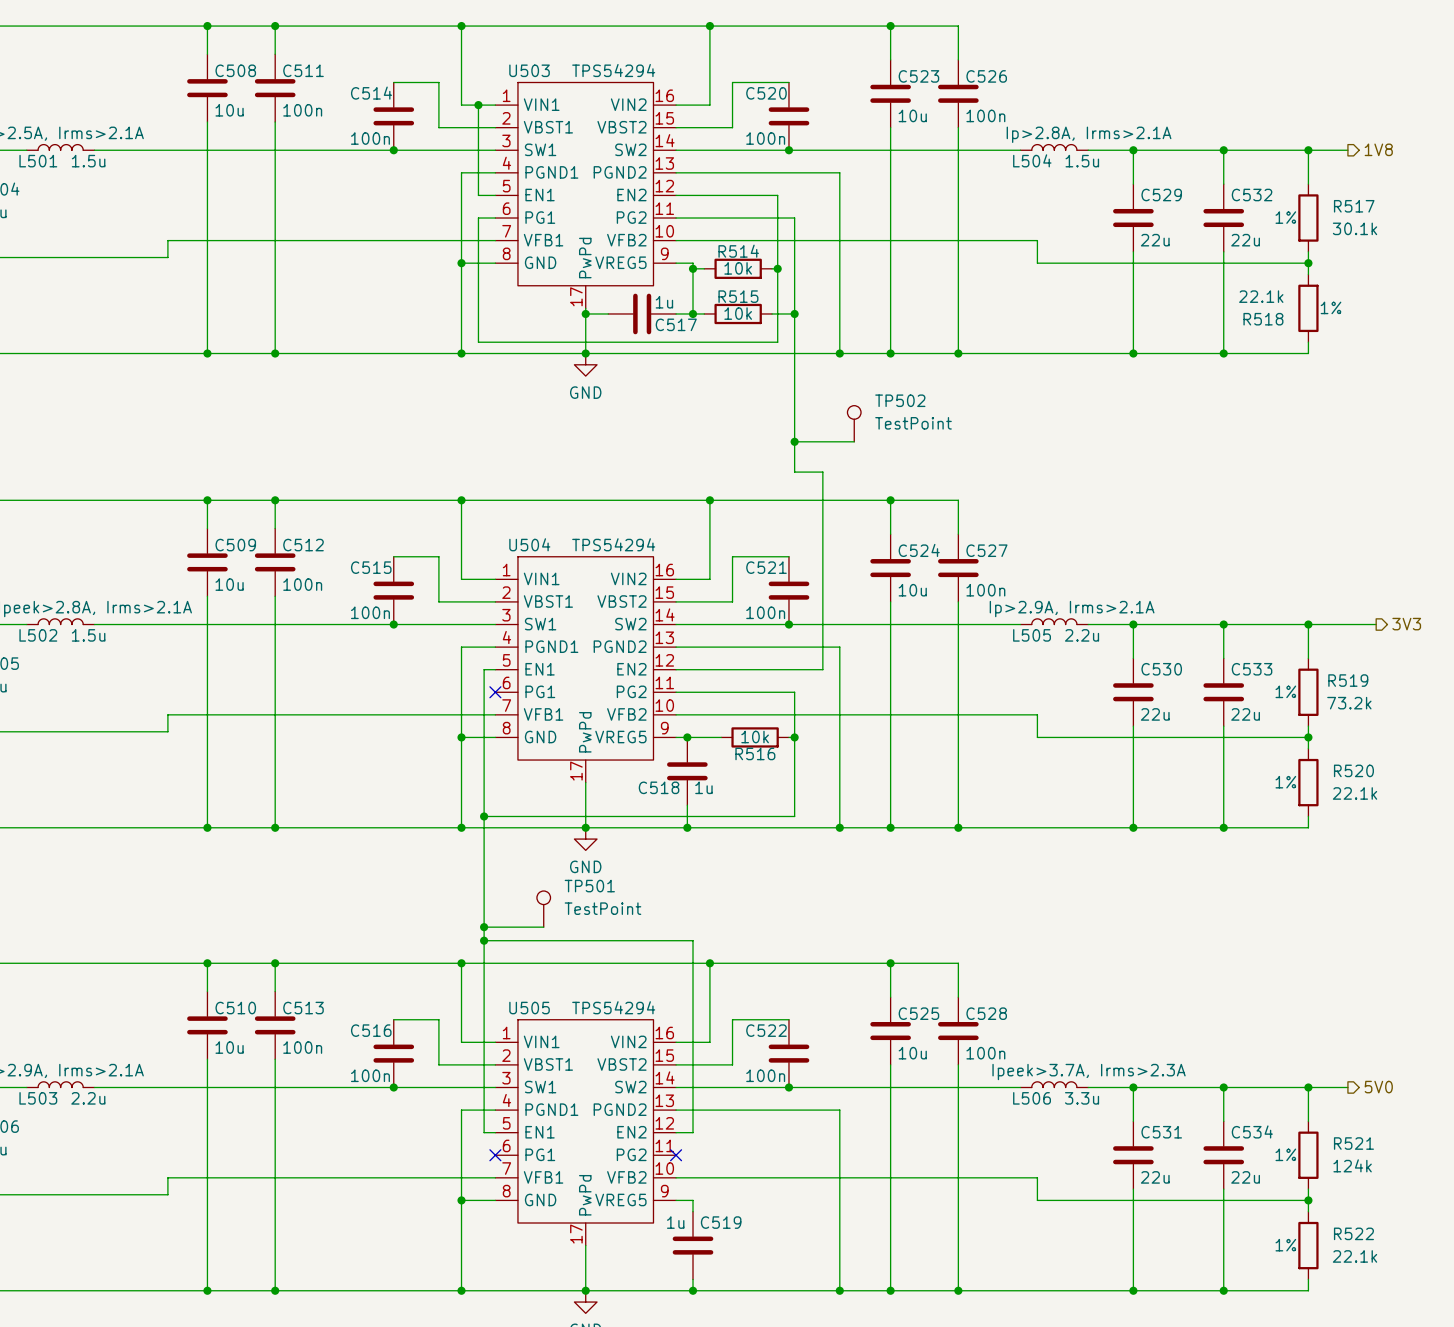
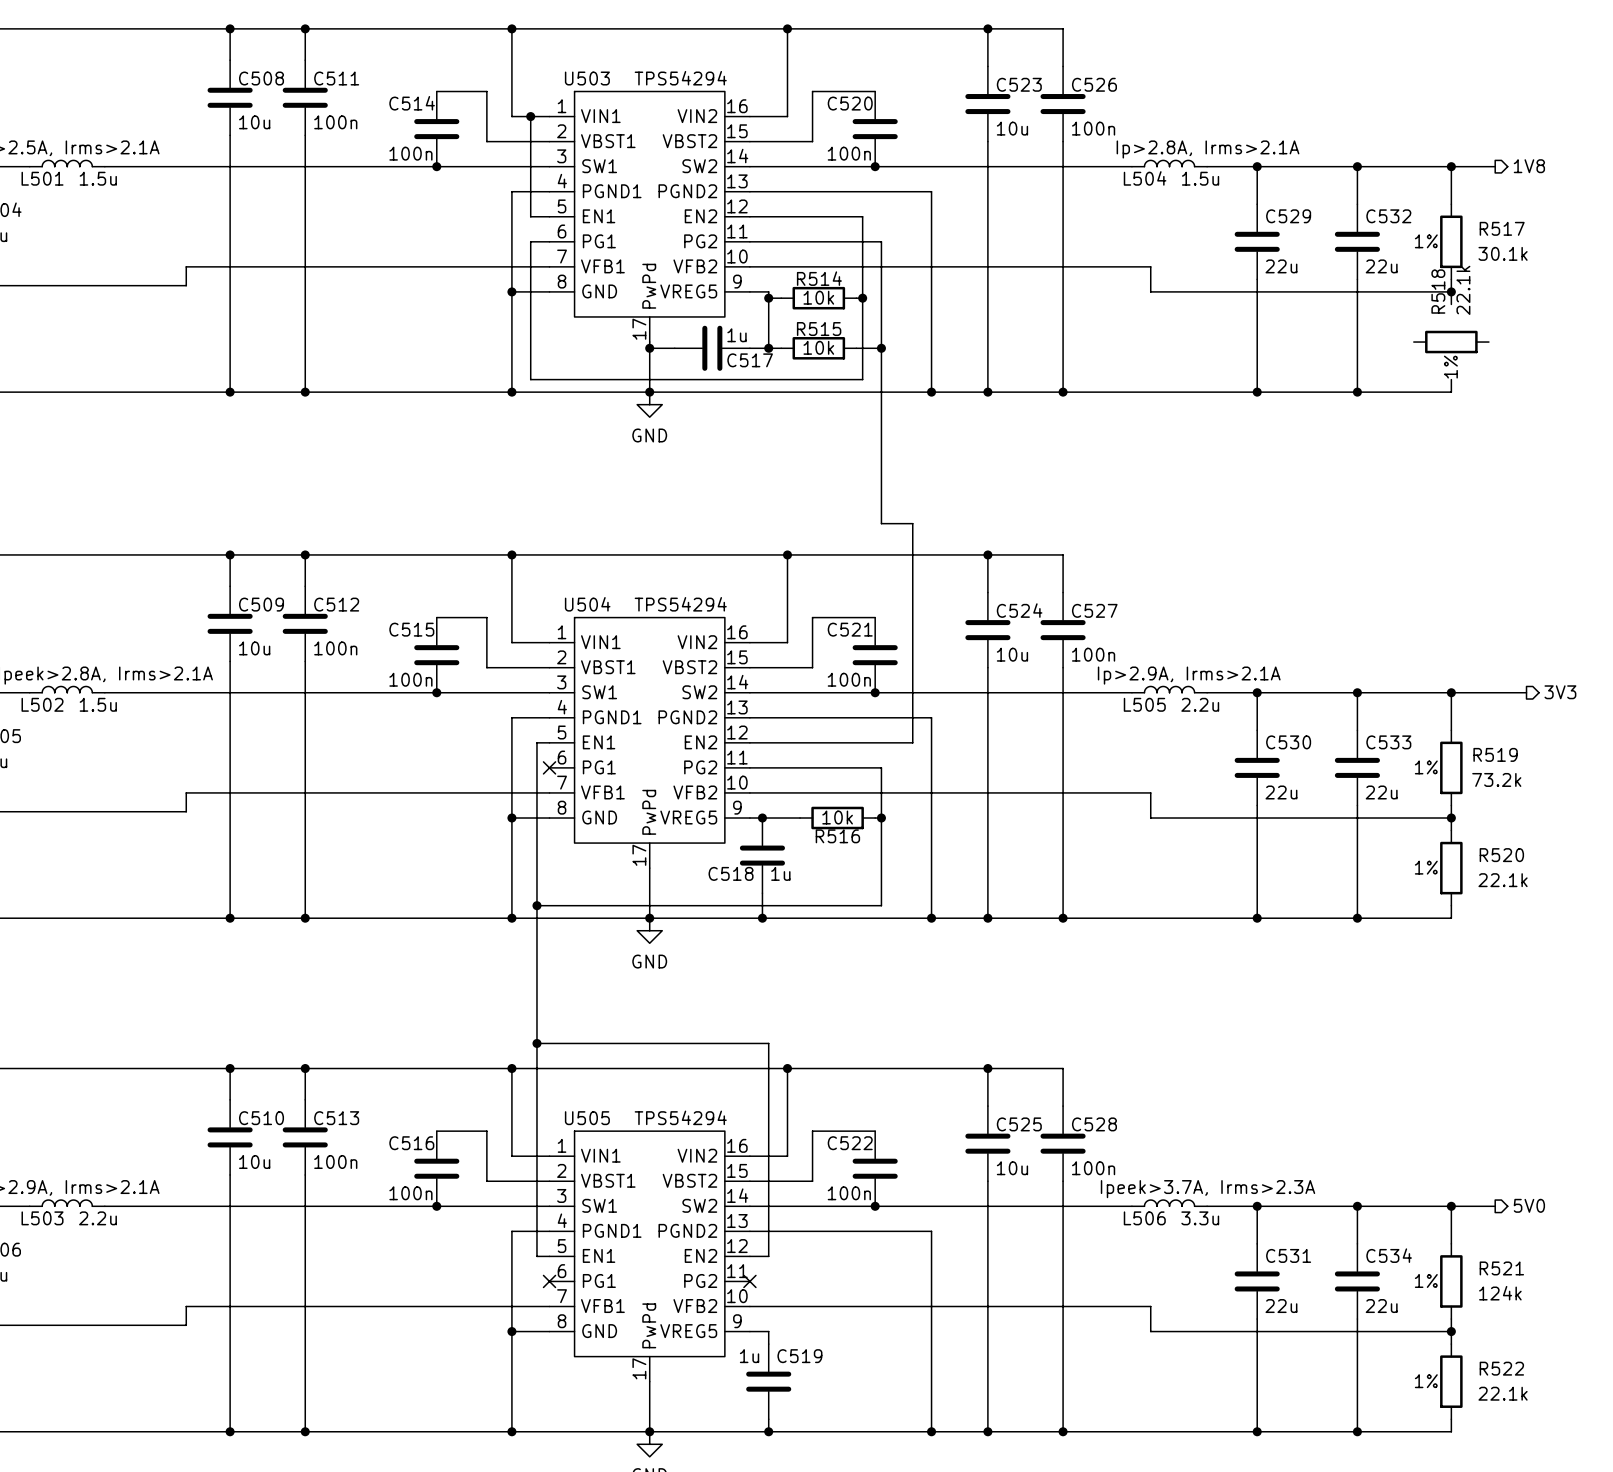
R518 rotation: 0° (1308, 308) -> 90° clockwise (1451, 342)
TP502: TestPoint (854, 423) -> none
wire: (794, 441) (854, 441) -> none
junction: (794, 441) -> none
TP501: TestPoint (543, 909) -> none
wire: (484, 927) (543, 927) -> none
junction: (484, 927) -> none

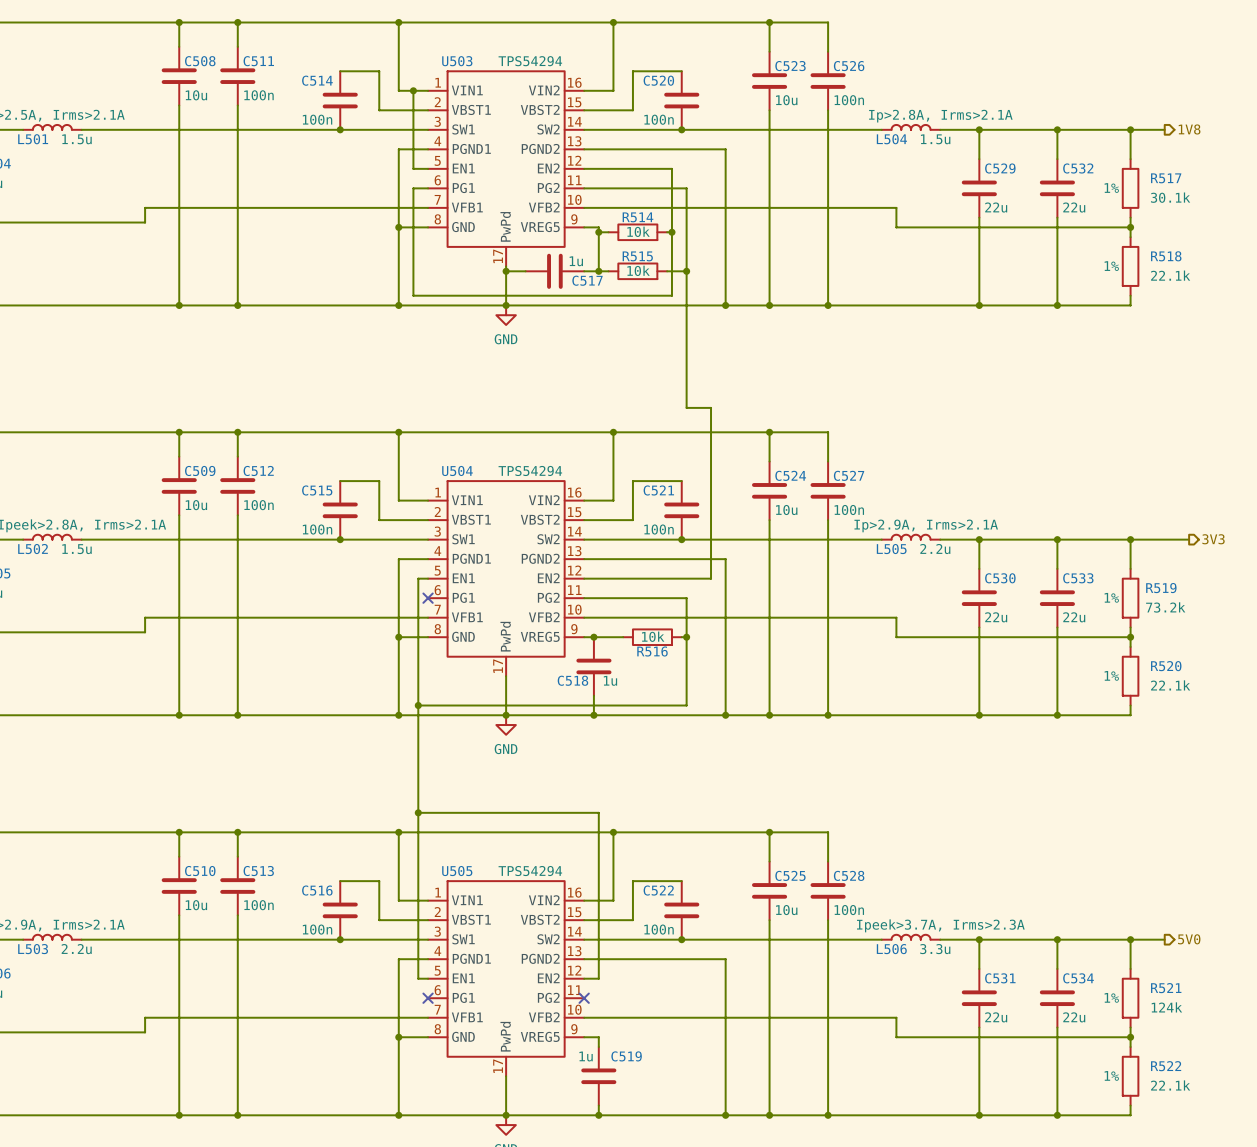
R518 rotation: 0° (1451, 342) -> 90° clockwise (1130, 266)

